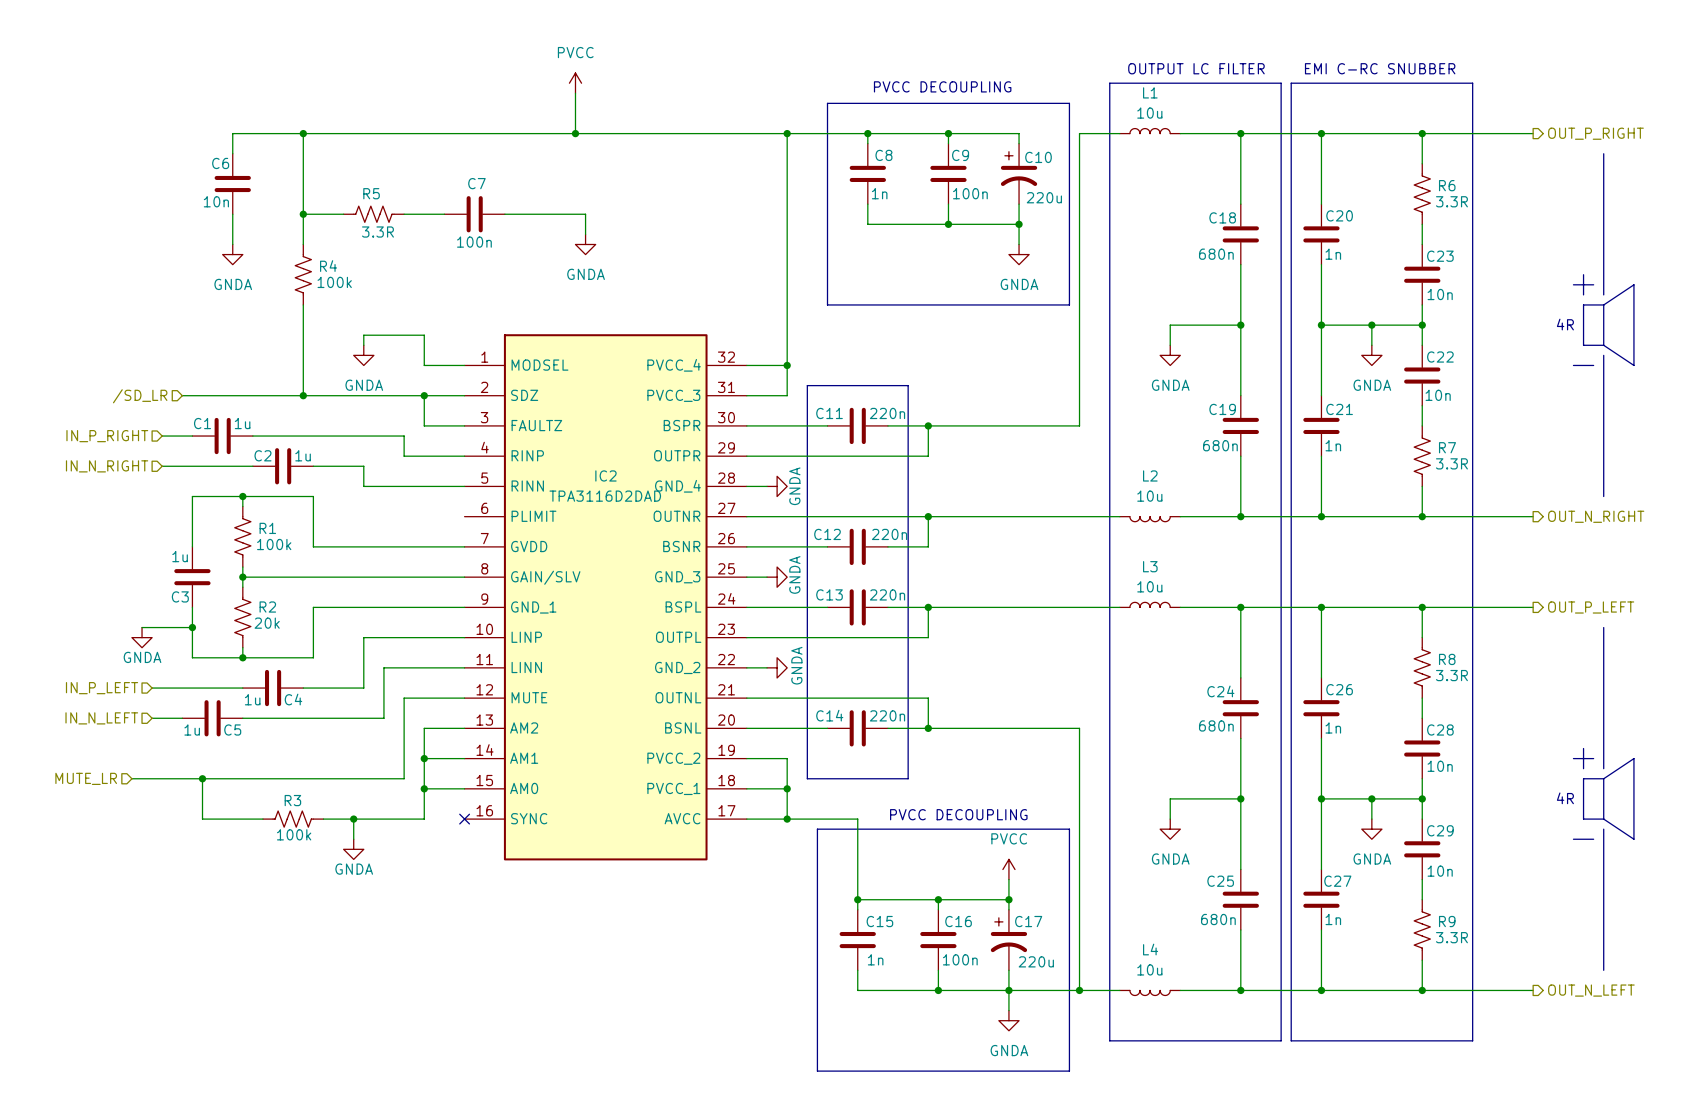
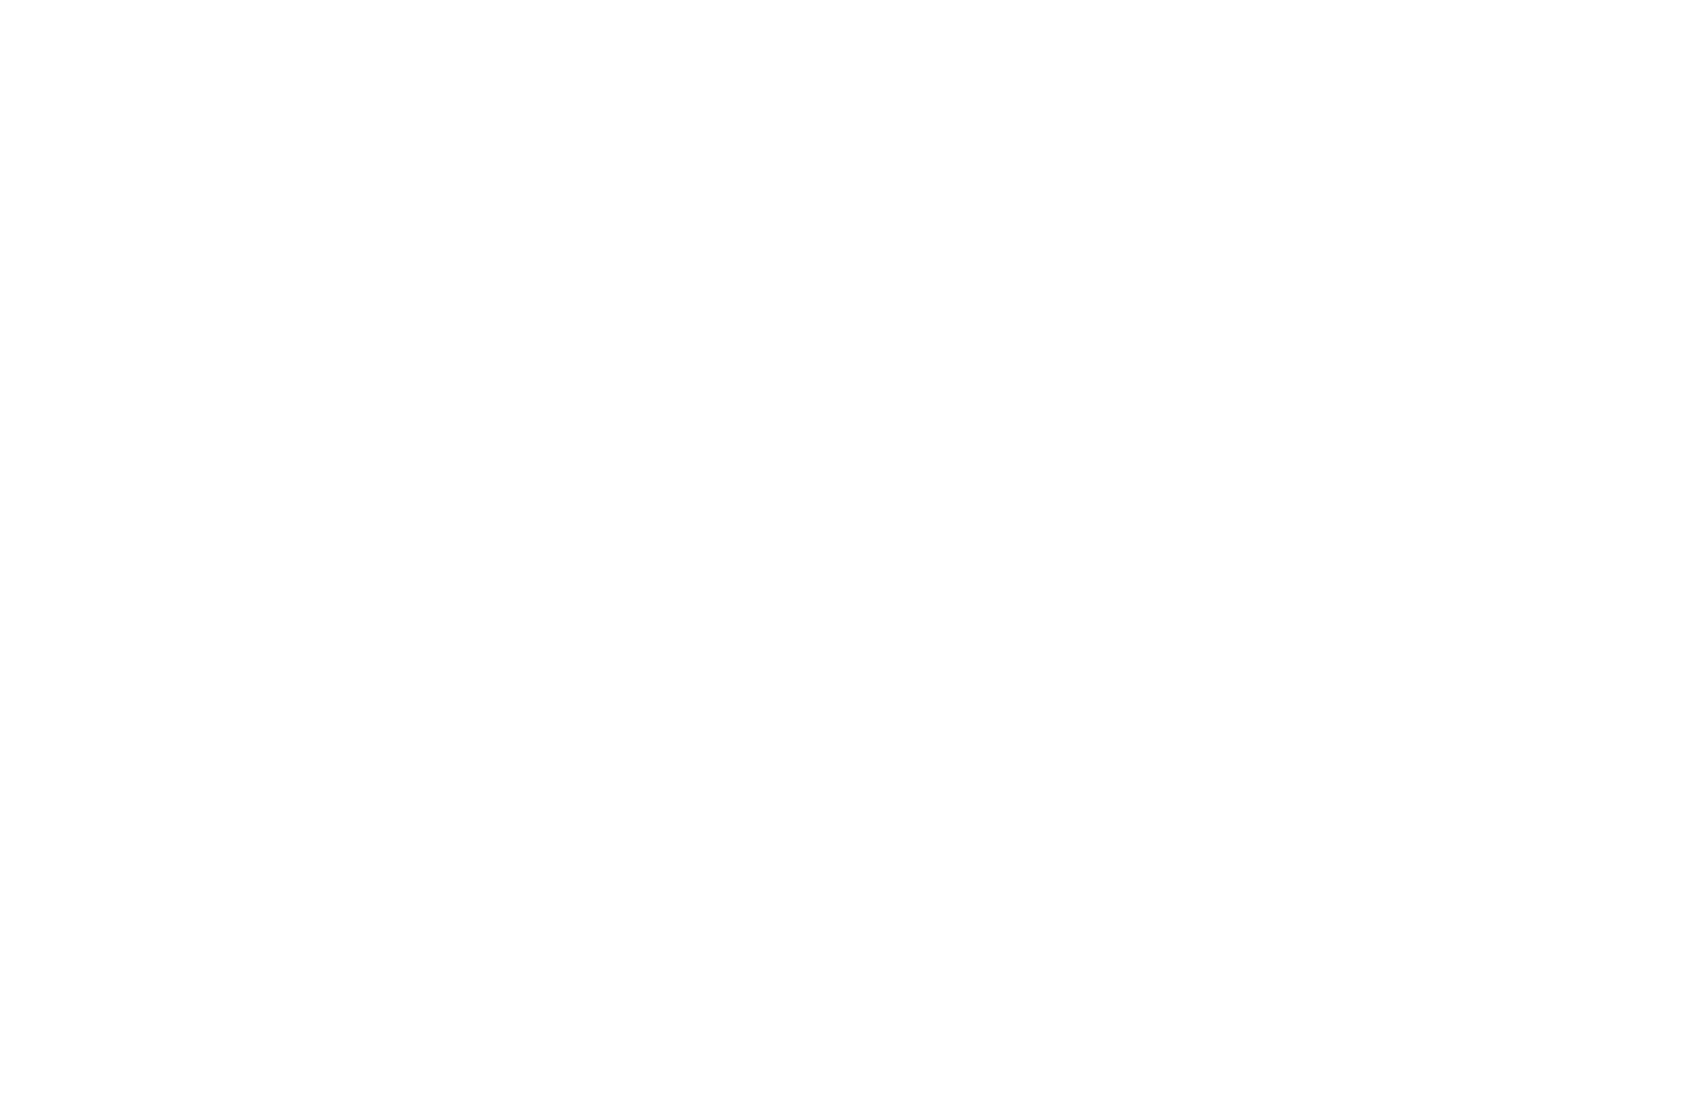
text: OUTPUT LC FILTER (1196, 68) -> none
text: EMI C-RC SNUBBER (1380, 68) -> none
power symbol: PVCC (575, 83) -> none
line: (1109, 83) (1281, 83) (1281, 1040) (1109, 1040) (1109, 83) -> none
line: (1291, 83) (1472, 83) (1472, 1040) (1291, 1040) (1291, 83) -> none
text: PVCC DECOUPLING (942, 86) -> none
wire: (575, 93) (575, 133) -> none
line: (827, 103) (1069, 103) (1069, 304) (827, 304) (827, 103) -> none
L1: 10u (1150, 131) -> none
wire: (303, 133) (303, 244) -> none
junction: (303, 133) -> none
junction: (575, 133) -> none
wire: (787, 133) (787, 395) (746, 395) -> none
junction: (787, 133) -> none
wire: (867, 133) (867, 143) -> none
junction: (867, 133) -> none
wire: (948, 133) (948, 143) -> none
junction: (948, 133) -> none
wire: (1119, 133) (1079, 133) (1079, 425) (887, 425) -> none
wire: (1180, 133) (1533, 133) -> none
wire: (1240, 133) (1240, 204) -> none
junction: (1240, 133) -> none
wire: (1321, 133) (1321, 204) -> none
junction: (1321, 133) -> none
wire: (1422, 133) (1422, 163) -> none
junction: (1422, 133) -> none
hierarchical label: OUT_P_RIGHT (1595, 133) -> none
wire: (1019, 143) (1019, 133) (232, 133) (232, 153) -> none
line: (1603, 153) (1603, 294) -> none
C8: 1n (867, 173) -> none
C9: 100n (948, 173) -> none
C10: 220u (1019, 173) -> none
C6: 10n (232, 184) -> none
R6: 3.3R (1422, 194) -> none
wire: (867, 204) (867, 224) (1019, 224) -> none
wire: (948, 204) (948, 224) -> none
wire: (1019, 204) (1019, 244) -> none
wire: (232, 214) (232, 244) -> none
wire: (303, 214) (343, 214) -> none
junction: (303, 214) -> none
R5: 3.3R (373, 214) -> none
wire: (404, 214) (444, 214) -> none
C7: 100n (474, 214) -> none
wire: (504, 214) (585, 214) (585, 234) -> none
junction: (948, 224) -> none
junction: (1019, 224) -> none
wire: (1422, 224) (1422, 244) -> none
C18: 680n (1240, 234) -> none
C20: 1n (1321, 234) -> none
power symbol: GNDA (585, 244) -> none
power symbol: GNDA (232, 254) -> none
power symbol: GNDA (1019, 254) -> none
wire: (1240, 264) (1240, 395) -> none
wire: (1321, 264) (1321, 395) -> none
R4: 100k (303, 274) -> none
C23: 10n (1422, 274) -> none
line: (1583, 274) (1583, 294) -> none
line: (1573, 284) (1593, 284) -> none
wire: (303, 304) (303, 395) -> none
wire: (1422, 304) (1422, 345) -> none
line: (1603, 304) (1583, 304) (1583, 345) (1603, 345) -> none
line: (1603, 304) (1603, 345) -> none
line: (1603, 304) (1633, 284) (1633, 365) (1603, 345) -> none
text: 4R (1565, 324) -> none
wire: (1240, 325) (1170, 325) (1170, 345) -> none
junction: (1240, 325) -> none
wire: (1321, 325) (1422, 325) -> none
junction: (1321, 325) -> none
wire: (1371, 325) (1371, 345) -> none
junction: (1371, 325) -> none
junction: (1422, 325) -> none
wire: (363, 345) (363, 335) (424, 335) (424, 365) (464, 365) -> none
power symbol: GNDA (363, 355) -> none
power symbol: GNDA (1170, 355) -> none
power symbol: GNDA (1371, 355) -> none
line: (1603, 355) (1603, 496) -> none
wire: (746, 365) (787, 365) -> none
junction: (787, 365) -> none
line: (1573, 365) (1593, 365) -> none
C22: 10n (1422, 375) -> none
line: (807, 385) (807, 778) (908, 778) (908, 385) (807, 385) -> none
wire: (182, 395) (464, 395) -> none
junction: (303, 395) -> none
wire: (424, 395) (424, 425) (464, 425) -> none
junction: (424, 395) -> none
hierarchical label: /SD_LR (140, 396) -> none
wire: (1422, 405) (1422, 425) -> none
wire: (746, 425) (827, 425) -> none
C11: 220n (857, 425) -> none
wire: (928, 425) (928, 456) (746, 456) -> none
junction: (928, 425) -> none
C19: 680n (1240, 425) -> none
C21: 1n (1321, 425) -> none
hierarchical label: IN_P_RIGHT (107, 436) -> none
wire: (162, 436) (192, 436) -> none
C1: 1u (222, 436) -> none
wire: (252, 436) (404, 436) (404, 456) (464, 456) -> none
wire: (1240, 456) (1240, 516) -> none
wire: (1321, 456) (1321, 516) -> none
R7: 3.3R (1422, 456) -> none
hierarchical label: IN_N_RIGHT (107, 466) -> none
wire: (162, 466) (252, 466) -> none
C2: 1u (283, 466) -> none
wire: (313, 466) (363, 466) (363, 486) (464, 486) -> none
wire: (746, 486) (767, 486) -> none
power symbol: GNDA (777, 486) -> none
wire: (1422, 486) (1422, 516) -> none
wire: (242, 496) (242, 506) -> none
junction: (242, 496) -> none
wire: (746, 516) (1119, 516) -> none
wire: (928, 516) (928, 546) (887, 546) -> none
junction: (928, 516) -> none
wire: (1180, 516) (1533, 516) -> none
junction: (1240, 516) -> none
junction: (1321, 516) -> none
junction: (1422, 516) -> none
hierarchical label: OUT_N_RIGHT (1596, 516) -> none
L2: 10u (1150, 519) -> none
R1: 100k (242, 536) -> none
wire: (192, 546) (192, 496) (313, 496) (313, 546) (464, 546) -> none
wire: (746, 546) (827, 546) -> none
C12: 220n (857, 546) -> none
wire: (242, 567) (242, 587) -> none
C3: 1u (192, 577) -> none
wire: (242, 577) (464, 577) -> none
junction: (242, 577) -> none
wire: (746, 577) (767, 577) -> none
power symbol: GNDA (777, 577) -> none
IC2: TPA3116D2DAD (605, 597) -> none
L3: 10u (1150, 604) -> none
wire: (192, 607) (192, 657) (313, 657) (313, 607) (464, 607) -> none
wire: (746, 607) (827, 607) -> none
C13: 220n (857, 607) -> none
wire: (887, 607) (1119, 607) -> none
wire: (928, 607) (928, 637) (746, 637) -> none
junction: (928, 607) -> none
wire: (1180, 607) (1533, 607) -> none
wire: (1240, 607) (1240, 677) -> none
junction: (1240, 607) -> none
wire: (1321, 607) (1321, 677) -> none
junction: (1321, 607) -> none
wire: (1422, 607) (1422, 637) -> none
junction: (1422, 607) -> none
hierarchical label: OUT_P_LEFT (1591, 607) -> none
R2: 20k (242, 617) -> none
wire: (142, 627) (192, 627) -> none
junction: (192, 627) -> none
line: (1603, 627) (1603, 768) -> none
power symbol: GNDA (142, 637) -> none
wire: (464, 637) (363, 637) (363, 688) (303, 688) -> none
wire: (242, 647) (242, 657) -> none
junction: (242, 657) -> none
wire: (464, 667) (383, 667) (383, 718) (242, 718) -> none
wire: (746, 667) (767, 667) -> none
power symbol: GNDA (777, 667) -> none
R8: 3.3R (1422, 667) -> none
hierarchical label: IN_P_LEFT (102, 688) -> none
wire: (152, 688) (242, 688) -> none
C4: 1u (273, 688) -> none
wire: (464, 698) (404, 698) (404, 778) (131, 778) -> none
wire: (746, 698) (928, 698) (928, 728) -> none
wire: (1422, 698) (1422, 718) -> none
C24: 680n (1240, 708) -> none
C26: 1n (1321, 708) -> none
hierarchical label: IN_N_LEFT (101, 718) -> none
wire: (152, 718) (182, 718) -> none
C5: 1u (212, 718) -> none
wire: (464, 728) (424, 728) (424, 819) (323, 819) -> none
wire: (746, 728) (827, 728) -> none
C14: 220n (857, 728) -> none
wire: (887, 728) (1079, 728) (1079, 990) -> none
junction: (928, 728) -> none
wire: (1240, 738) (1240, 869) -> none
wire: (1321, 738) (1321, 869) -> none
C28: 10n (1422, 748) -> none
line: (1583, 748) (1583, 768) -> none
wire: (424, 758) (464, 758) -> none
junction: (424, 758) -> none
wire: (746, 758) (787, 758) (787, 819) -> none
line: (1573, 758) (1593, 758) -> none
hierarchical label: MUTE_LR (86, 778) -> none
wire: (202, 778) (202, 819) (262, 819) -> none
junction: (202, 778) -> none
wire: (1422, 778) (1422, 819) -> none
line: (1603, 778) (1603, 819) -> none
line: (1603, 778) (1583, 778) (1583, 819) (1603, 819) -> none
line: (1603, 778) (1633, 758) (1633, 839) (1603, 819) -> none
wire: (424, 788) (464, 788) -> none
junction: (424, 788) -> none
wire: (746, 788) (787, 788) -> none
junction: (787, 788) -> none
wire: (1240, 798) (1170, 798) (1170, 819) -> none
junction: (1240, 798) -> none
wire: (1321, 798) (1422, 798) -> none
junction: (1321, 798) -> none
wire: (1371, 798) (1371, 819) -> none
junction: (1371, 798) -> none
junction: (1422, 798) -> none
text: 4R (1565, 798) -> none
text: PVCC DECOUPLING (958, 814) -> none
R3: 100k (293, 819) -> none
wire: (353, 819) (353, 839) -> none
junction: (353, 819) -> none
no-connect mark: (464, 819) -> none
wire: (746, 819) (857, 819) (857, 909) -> none
junction: (787, 819) -> none
line: (817, 829) (1069, 829) (1069, 1071) (817, 1071) (817, 829) -> none
power symbol: GNDA (1170, 829) -> none
power symbol: GNDA (1371, 829) -> none
line: (1603, 829) (1603, 970) -> none
line: (1573, 839) (1593, 839) -> none
power symbol: GNDA (353, 849) -> none
C29: 10n (1422, 849) -> none
power symbol: PVCC (1008, 869) -> none
wire: (1008, 879) (1008, 909) -> none
wire: (1422, 879) (1422, 899) -> none
wire: (857, 899) (1008, 899) -> none
junction: (857, 899) -> none
wire: (938, 899) (938, 909) -> none
junction: (938, 899) -> none
junction: (1008, 899) -> none
C25: 680n (1240, 899) -> none
C27: 1n (1321, 899) -> none
wire: (1240, 929) (1240, 990) -> none
wire: (1321, 929) (1321, 990) -> none
R9: 3.3R (1422, 929) -> none
C15: 1n (857, 940) -> none
C16: 100n (938, 940) -> none
C17: 220u (1008, 940) -> none
wire: (1422, 960) (1422, 990) -> none
wire: (857, 970) (857, 990) (1119, 990) -> none
wire: (938, 970) (938, 990) -> none
wire: (1008, 970) (1008, 1010) -> none
junction: (938, 990) -> none
junction: (1008, 990) -> none
junction: (1079, 990) -> none
wire: (1180, 990) (1533, 990) -> none
junction: (1240, 990) -> none
junction: (1321, 990) -> none
junction: (1422, 990) -> none
hierarchical label: OUT_N_LEFT (1591, 990) -> none
L4: 10u (1150, 992) -> none
power symbol: GNDA (1008, 1020) -> none

